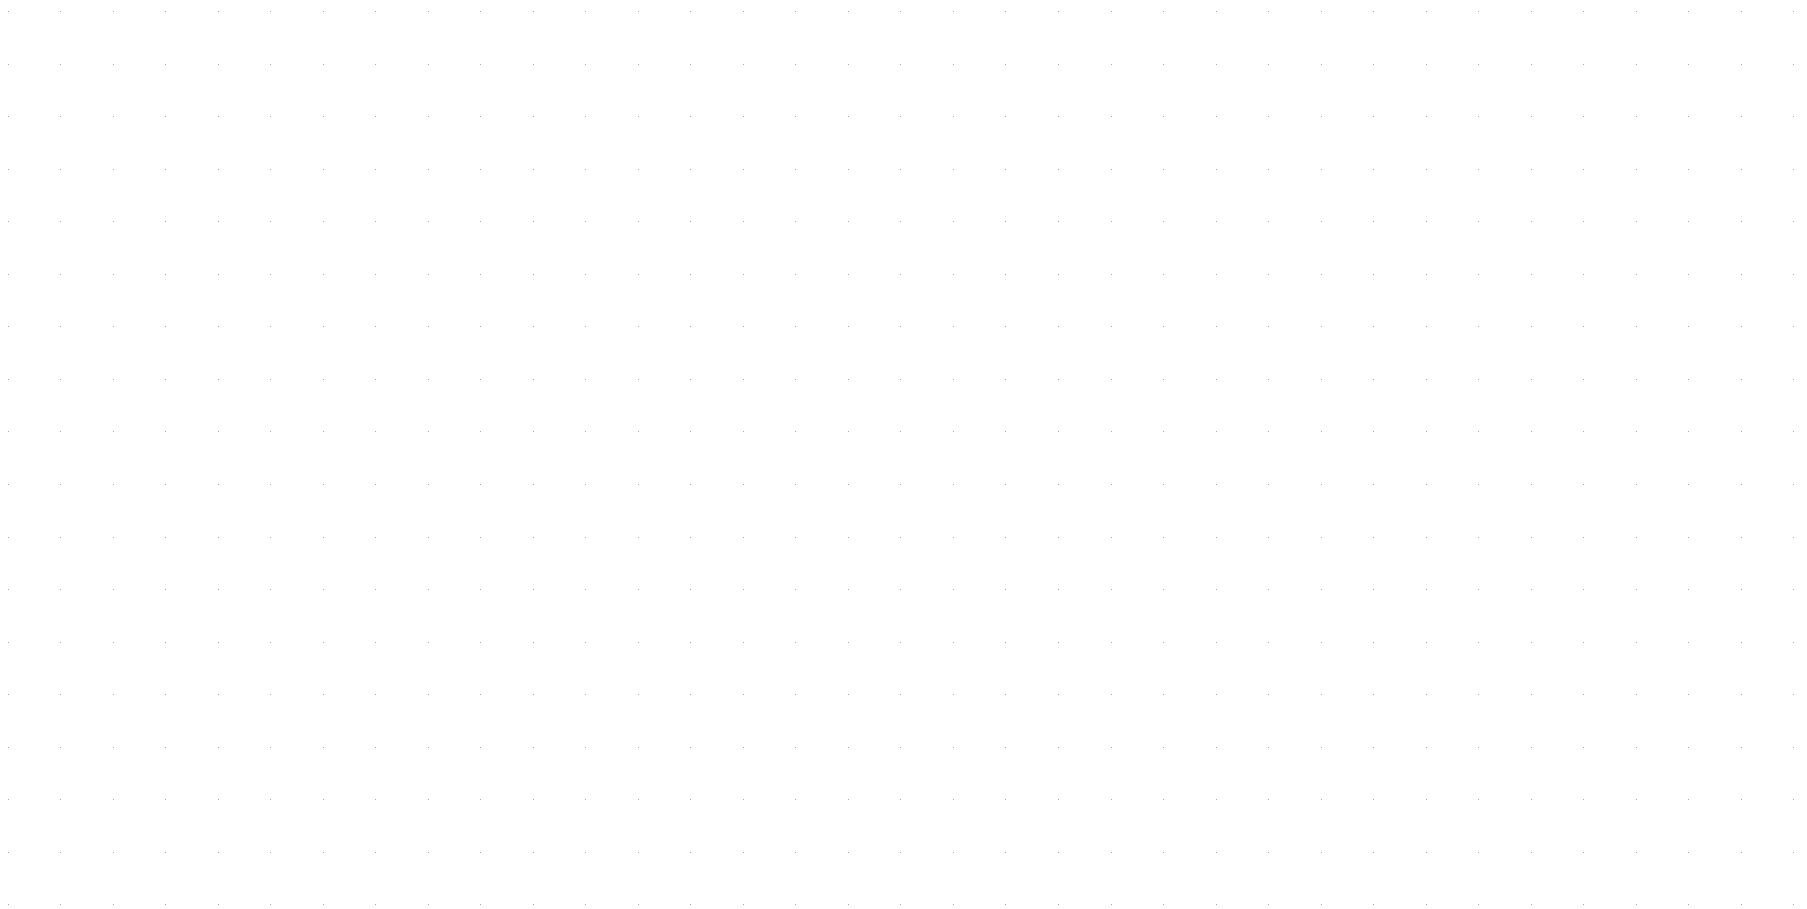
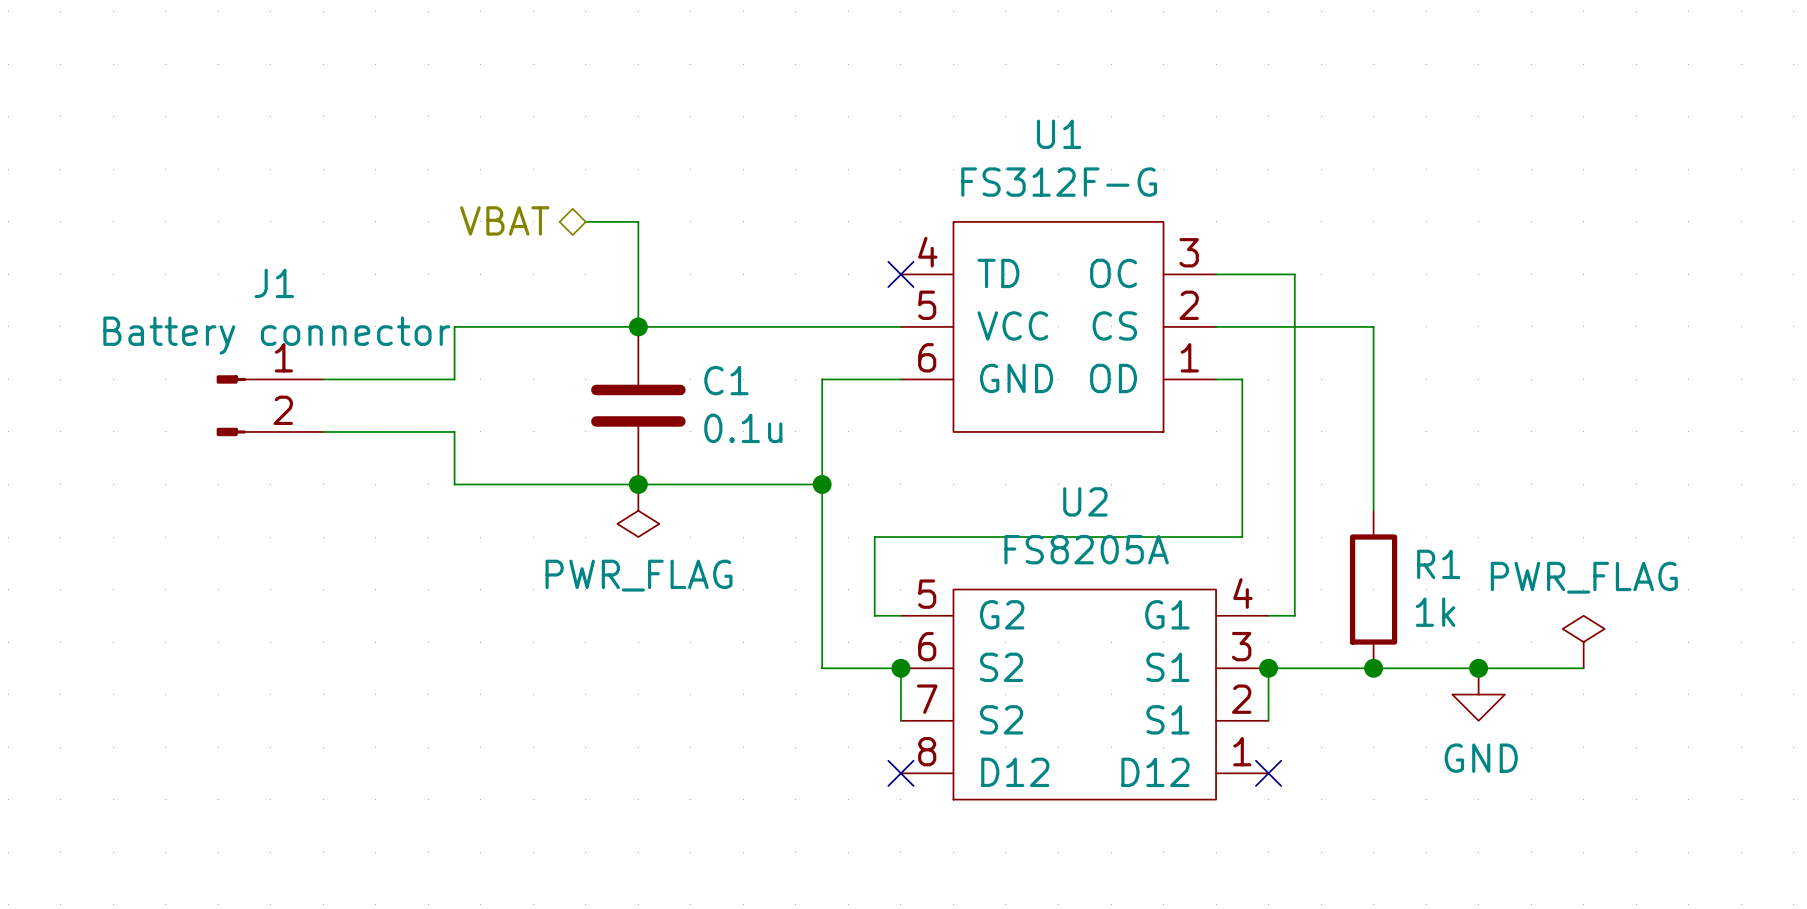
hierarchical label: none -> VBAT (504, 220)
wire: none -> (585, 221) (638, 221) (638, 326)
no-connect mark: none -> (900, 274)
wire: none -> (1216, 274) (1294, 274) (1294, 615) (1268, 615)
junction: none -> (638, 326)
wire: none -> (900, 326) (454, 326) (454, 379) (323, 379)
U1: none -> FS312F-G (1058, 326)
wire: none -> (1216, 326) (1373, 326) (1373, 510)
wire: none -> (900, 379) (822, 379) (822, 668) (900, 668) (900, 720)
wire: none -> (1216, 379) (1242, 379) (1242, 537) (874, 537) (874, 615) (900, 615)
J1: none -> Battery connector (269, 405)
C1: none -> 0.1u (638, 405)
wire: none -> (323, 431) (454, 431) (454, 484) (822, 484)
junction: none -> (638, 484)
junction: none -> (822, 484)
power symbol: none -> PWR_FLAG (638, 510)
R1: none -> 1k (1373, 589)
power symbol: none -> PWR_FLAG (1583, 642)
junction: none -> (900, 668)
junction: none -> (1268, 668)
junction: none -> (1373, 668)
junction: none -> (1478, 668)
wire: none -> (1583, 668) (1268, 668) (1268, 720)
U2: none -> FS8205A (1084, 694)
power symbol: none -> GND (1478, 694)
no-connect mark: none -> (900, 773)
no-connect mark: none -> (1268, 773)

